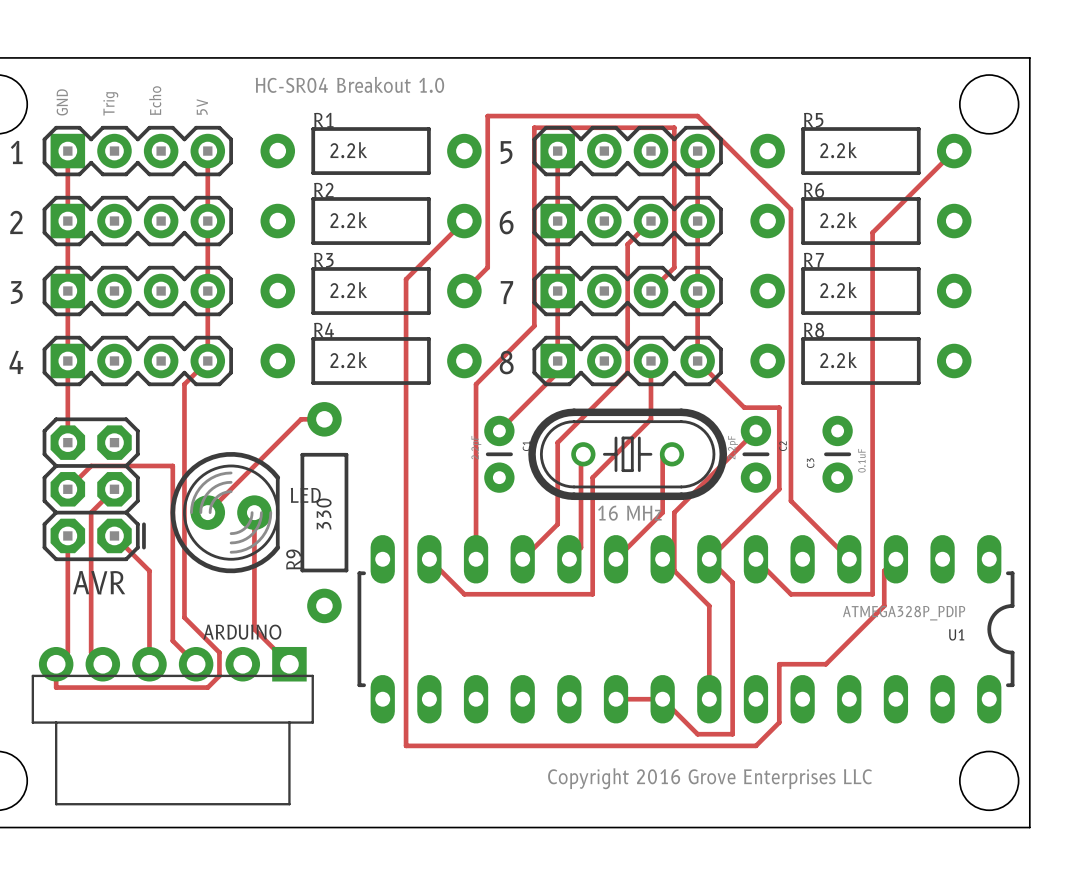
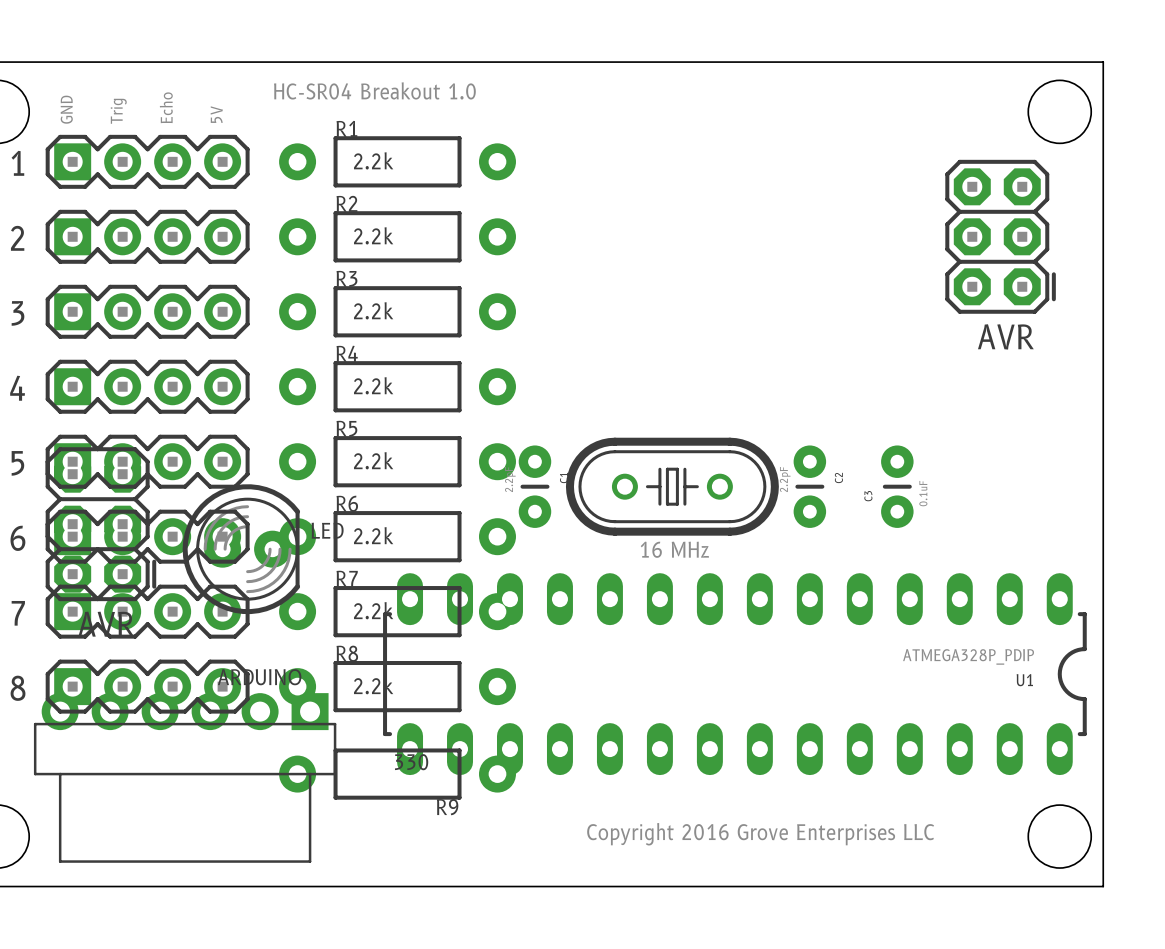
track: (67, 151) (67, 442) -> none
track: (207, 151) (207, 361) (184, 384) (184, 617) (219, 652) (219, 675) (207, 687) (56, 687) (56, 664) (67, 652) (67, 535) -> none
track: (557, 151) (557, 372) (499, 430) -> none
5 position: (627, 151) -> (147, 461)
track: (697, 151) (697, 361) (744, 407) (779, 407) (779, 489) (709, 559) (732, 582) (732, 734) (697, 734) (662, 699) (616, 699) -> none
R5 position: (860, 151) -> (397, 461)
track: (954, 151) (872, 232) (872, 594) (790, 594) (755, 559) -> none
track: (464, 221) (406, 279) (406, 745) (755, 745) (779, 722) (779, 664) (825, 664) (884, 605) (884, 570) (895, 559) -> none
6 position: (627, 221) -> (147, 536)
track: (650, 221) (627, 244) (627, 372) (557, 442) (557, 524) (522, 559) -> none
R6 position: (860, 221) -> (397, 536)
AVR: none -> (1000, 236)
track: (464, 291) (487, 267) (487, 116) (697, 116) (790, 209) (790, 500) (849, 559) -> none
7 position: (627, 291) -> (147, 611)
track: (650, 291) (674, 267) (674, 127) (534, 127) (534, 326) (476, 384) (476, 559) -> none
R7 position: (860, 291) -> (397, 611)
8 position: (627, 361) -> (147, 686)
track: (650, 361) (650, 419) (592, 477) (592, 594) (464, 594) (429, 559) -> none
R8 position: (860, 361) -> (397, 686)
track: (324, 419) (301, 419) (207, 512) -> none
track: (755, 430) (674, 512) (674, 570) -> none
track: (583, 454) (581, 454) (581, 547) (569, 559) -> none
track: (671, 454) (662, 454) (662, 512) (616, 559) -> none
track: (67, 489) (91, 465) (172, 465) (172, 640) (196, 664) -> none
track: (114, 489) (91, 512) (91, 652) (102, 664) -> none
track: (254, 512) (254, 629) (289, 664) -> none
R9 rotation: 0° (324, 512) -> 90° clockwise (397, 774)
R9 position: (324, 512) -> (397, 774)
track: (114, 535) (149, 570) (149, 664) -> none
R9 name position: R9 (293, 559) -> R9 (447, 807)
track: (662, 559) (709, 605) (709, 699) -> none

